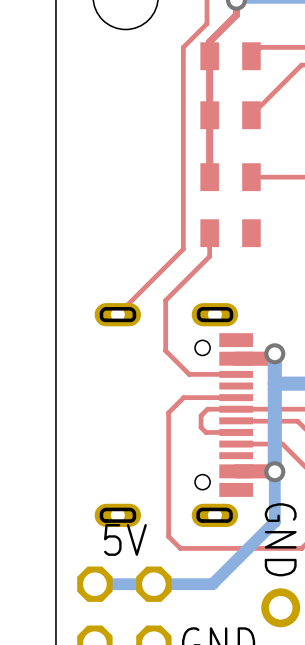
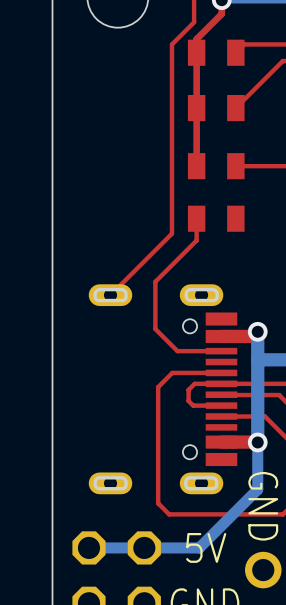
text position: 5V (125, 539) -> 5V (206, 547)

